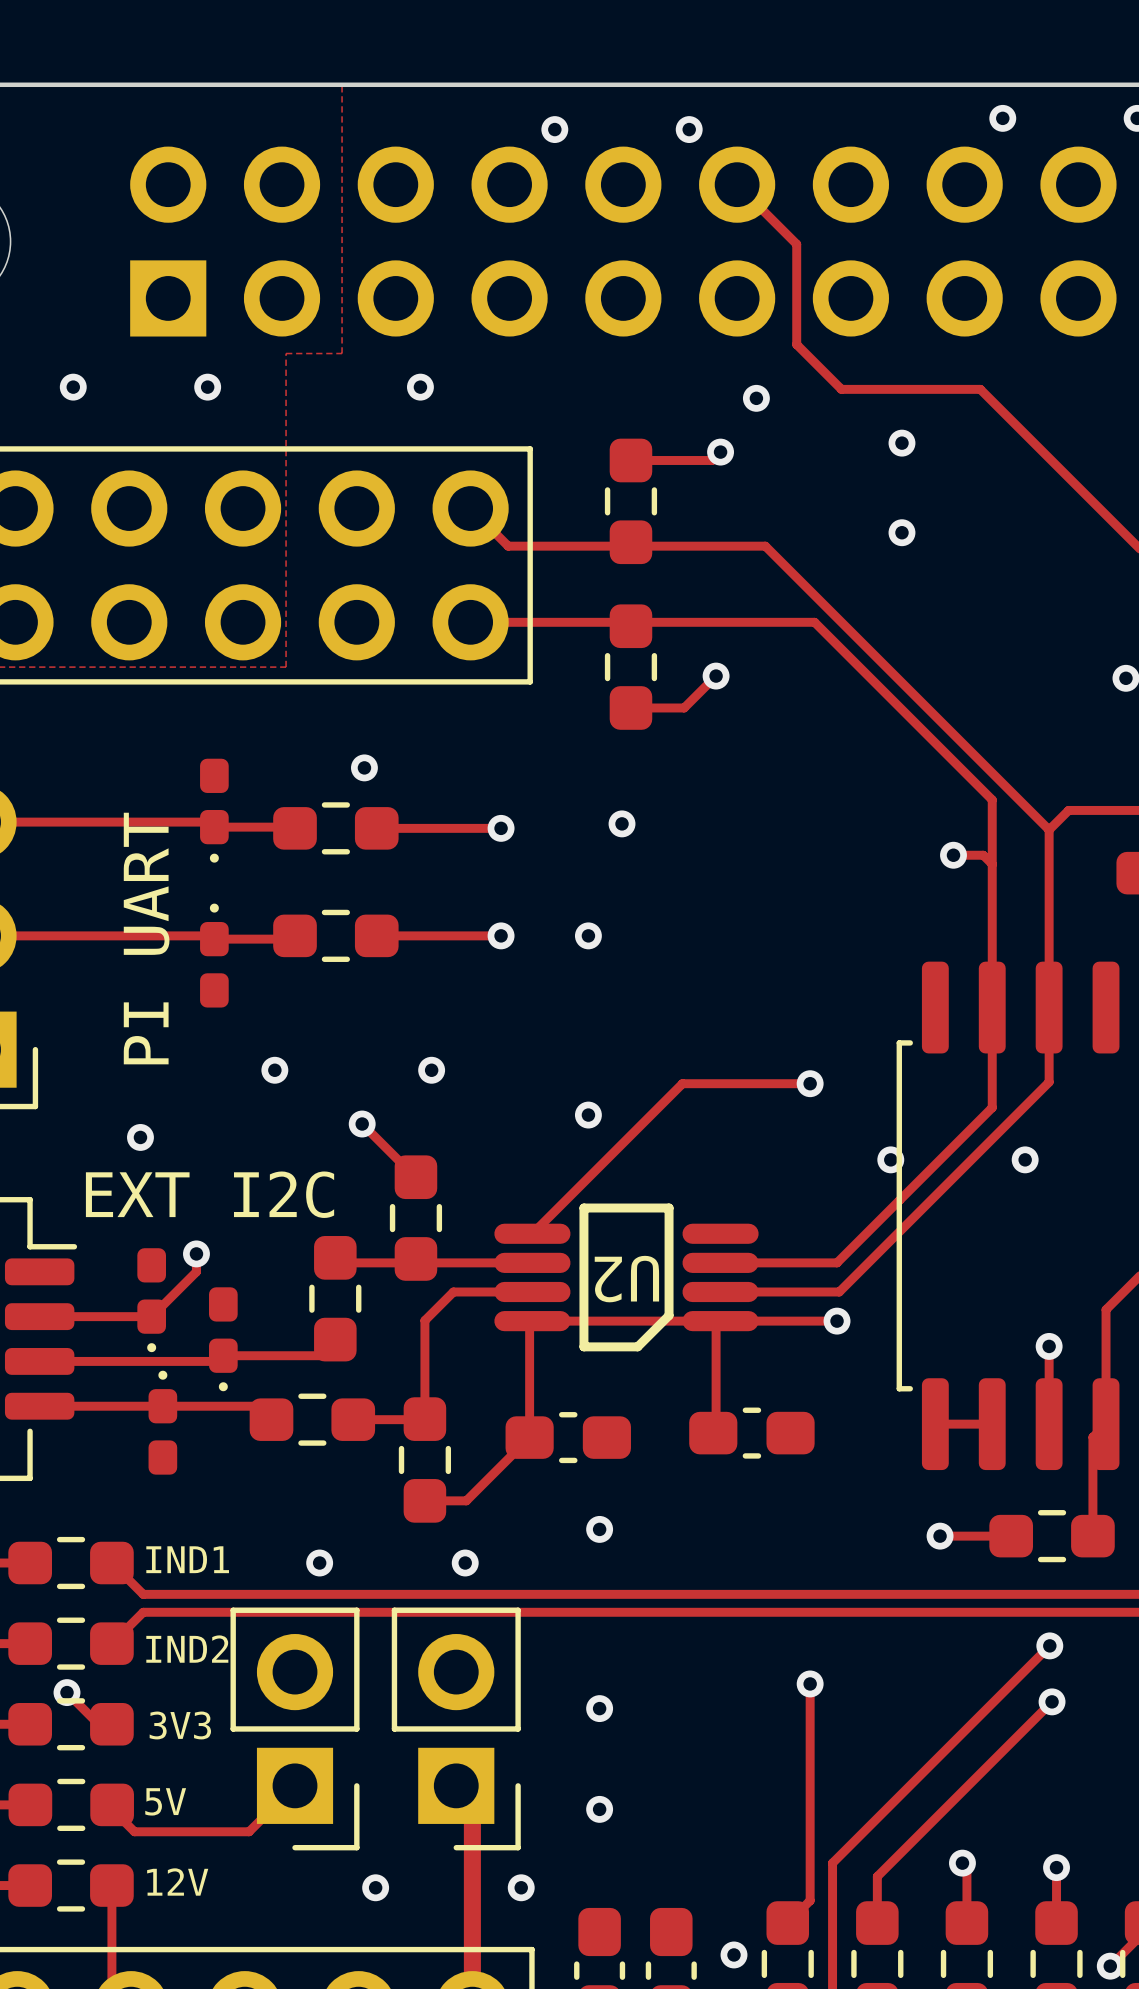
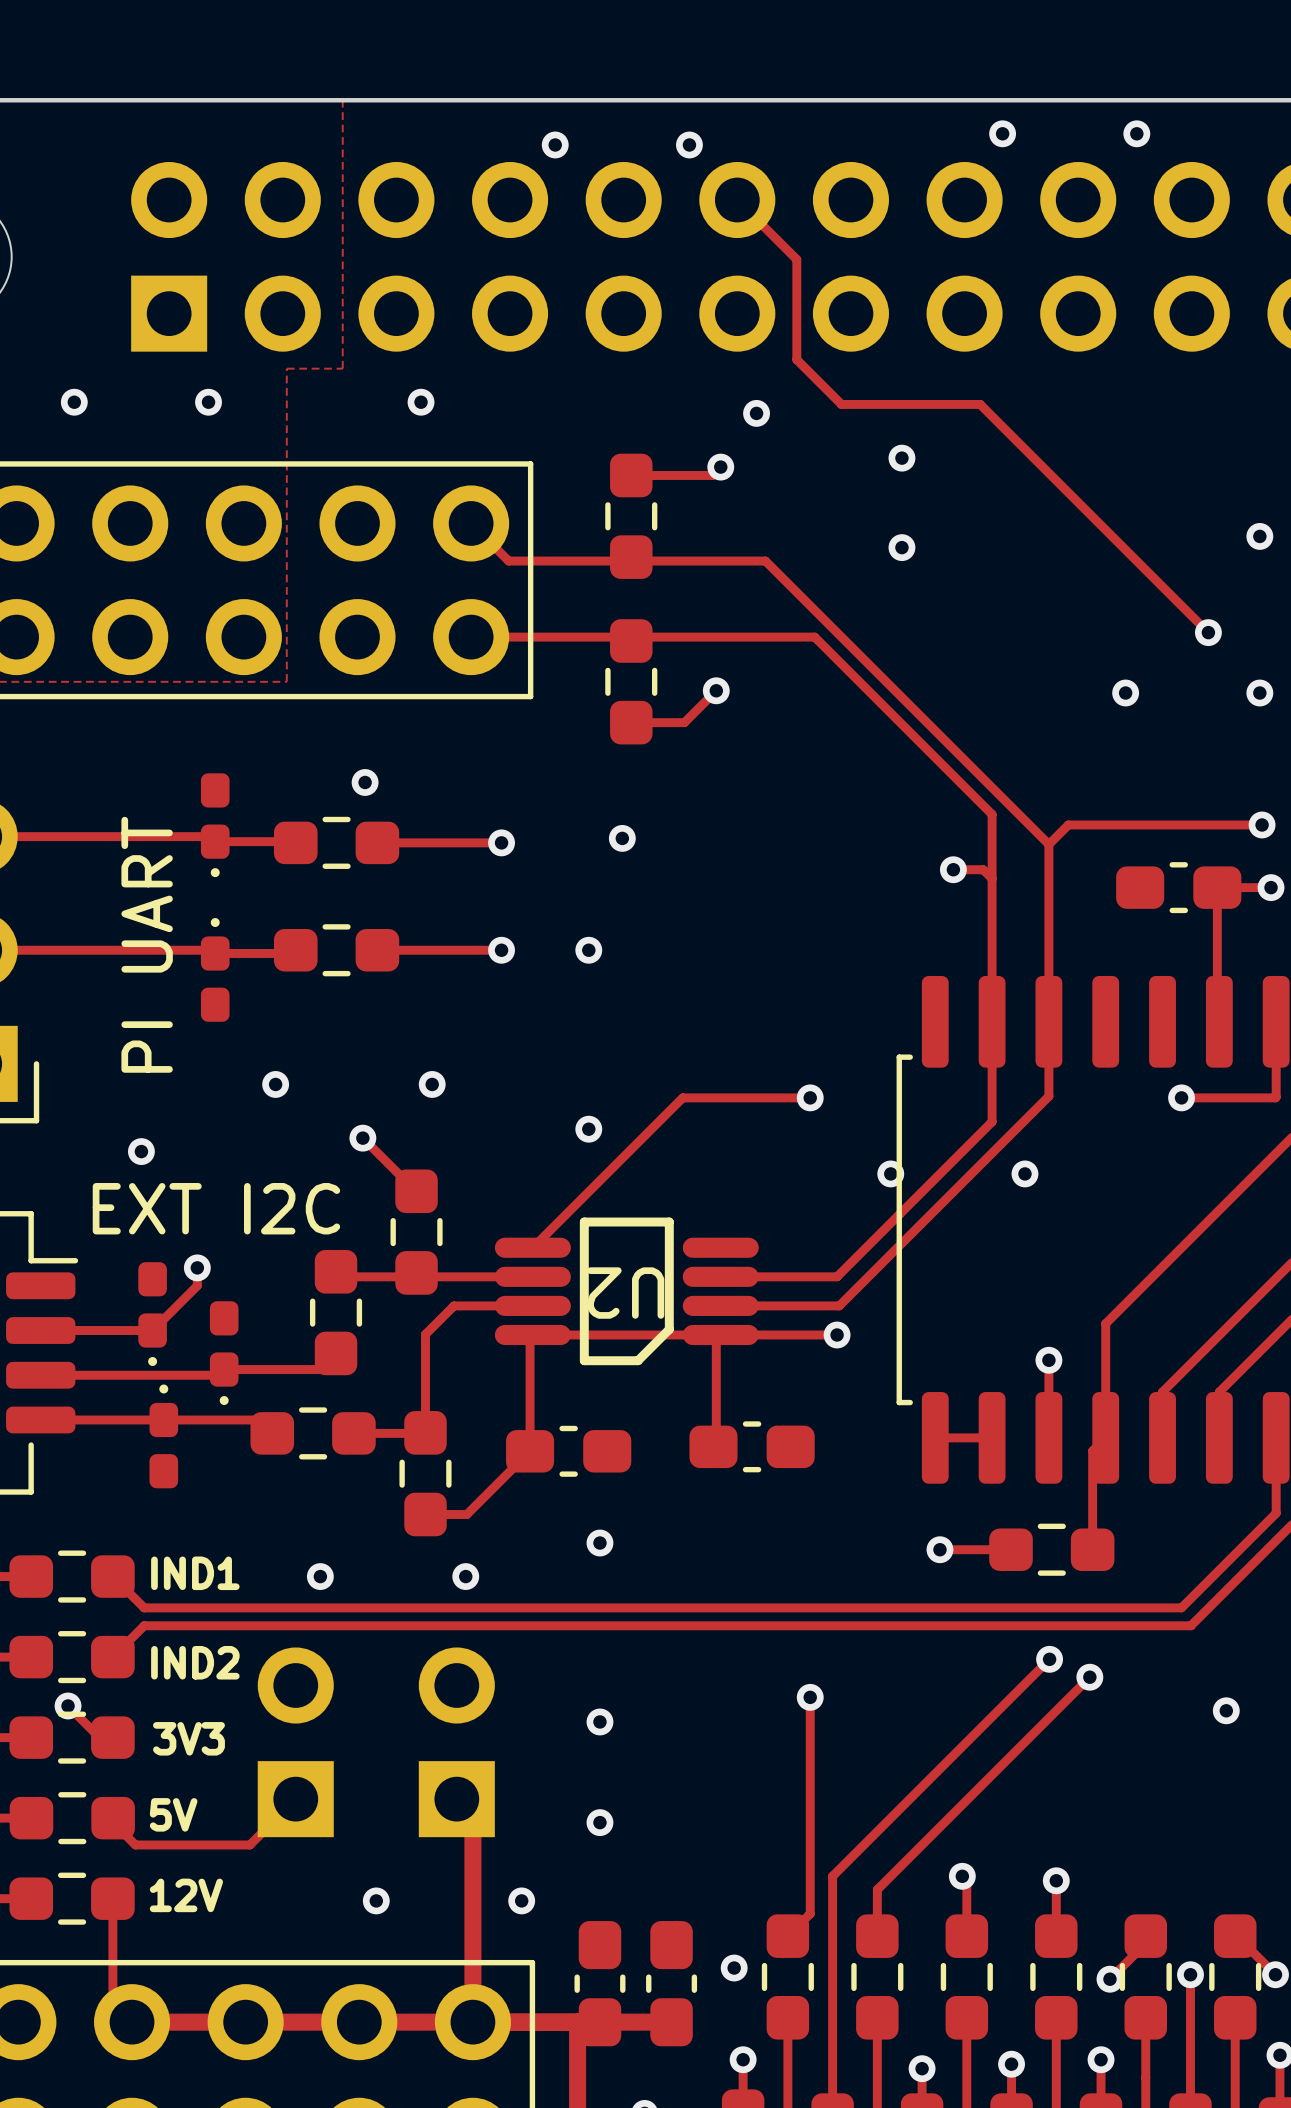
track: none -> (1089, 1677) (1051, 1715)
via position: (1052, 1701) -> (1089, 1677)
part side: top (295, 1728) -> bottom (295, 1742)
part side: top (456, 1728) -> bottom (456, 1742)

